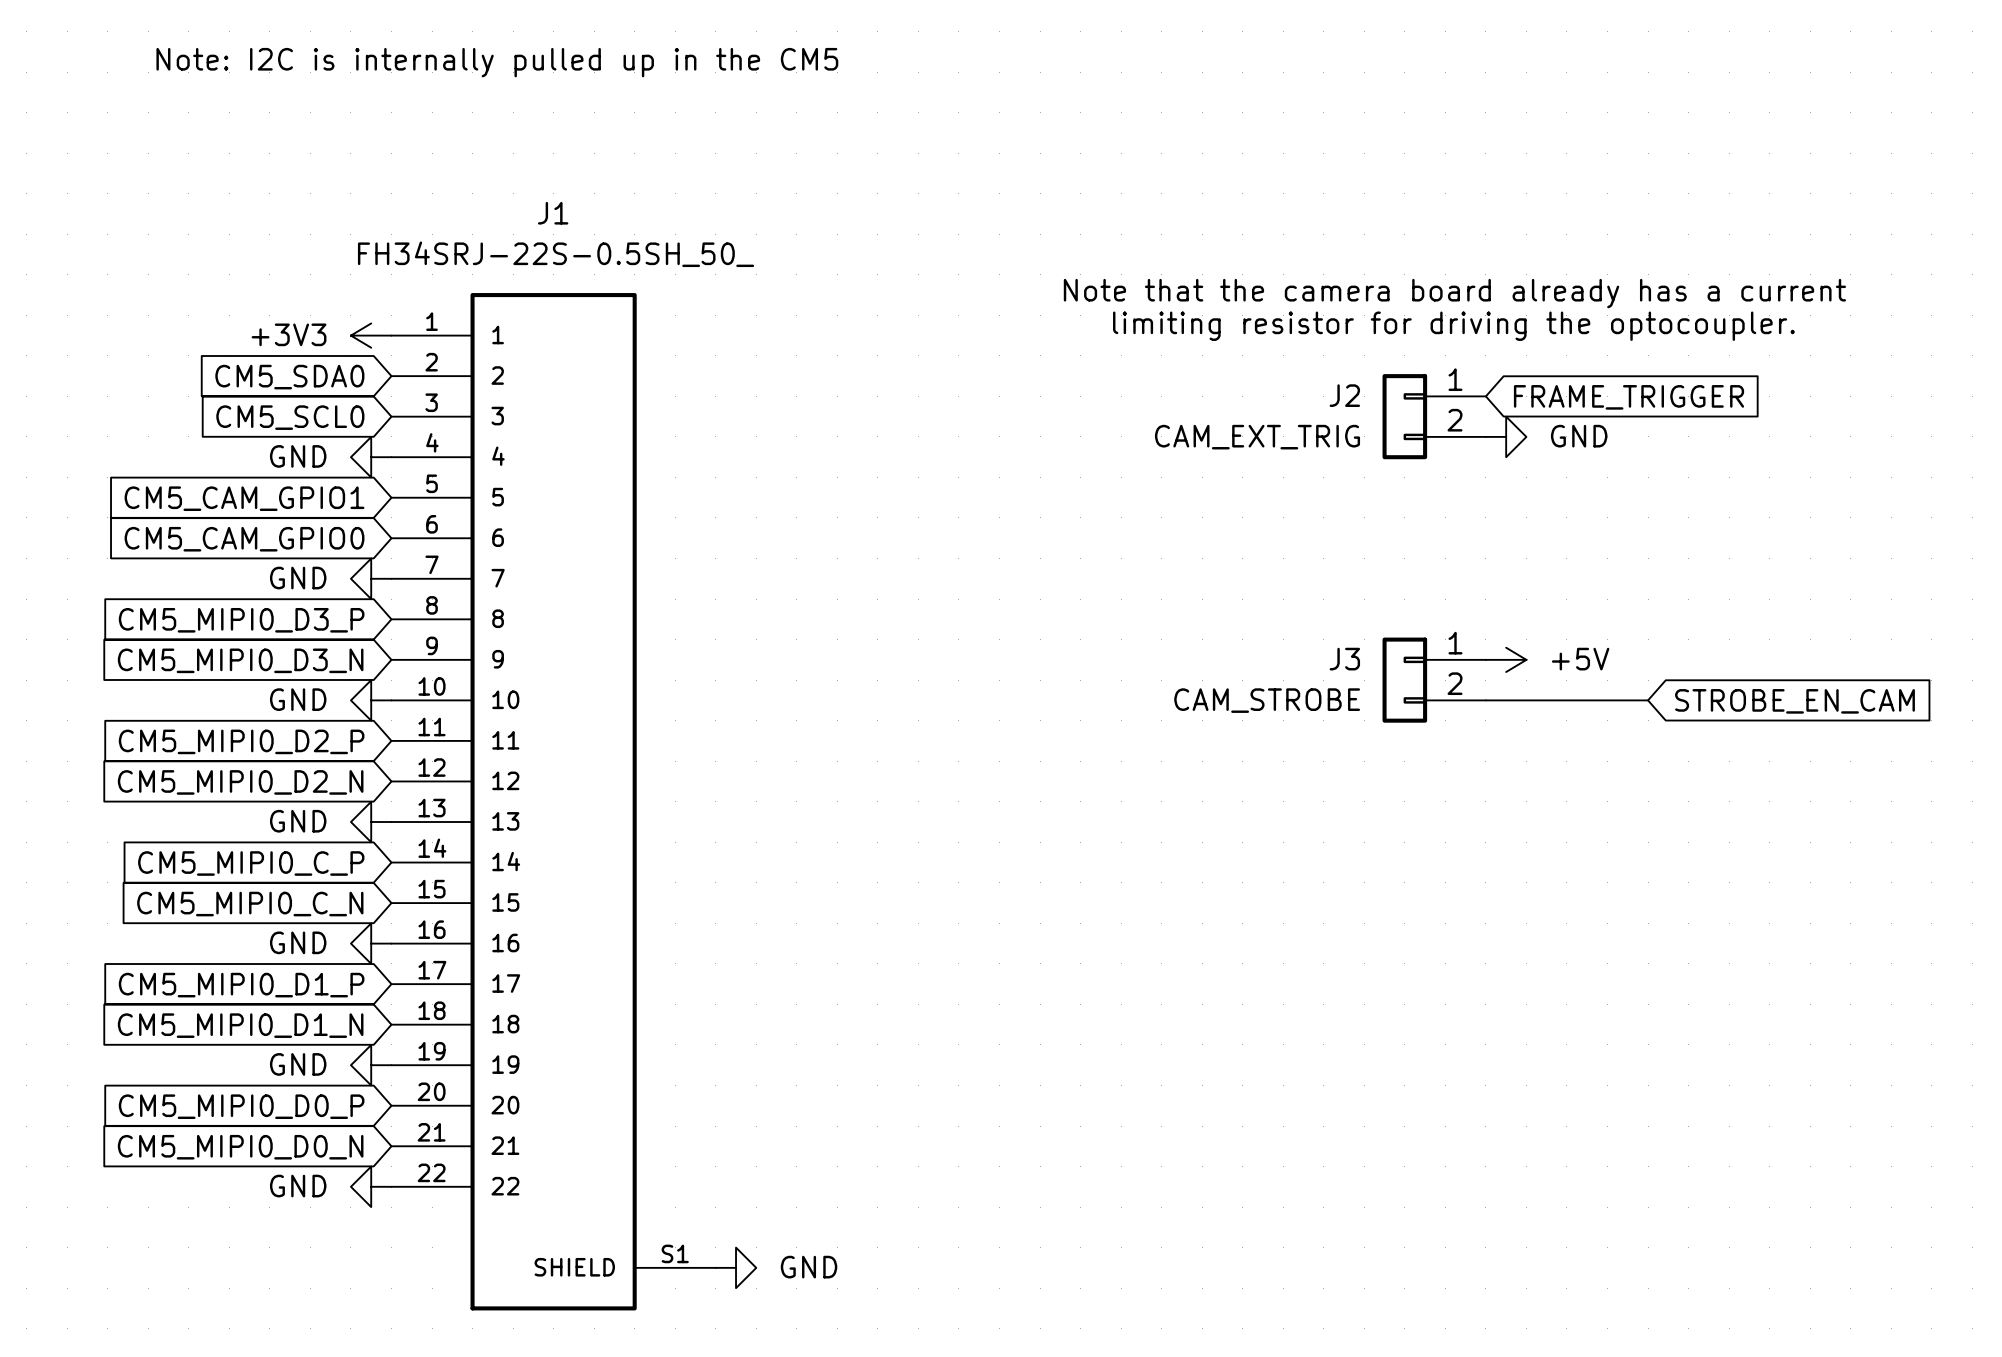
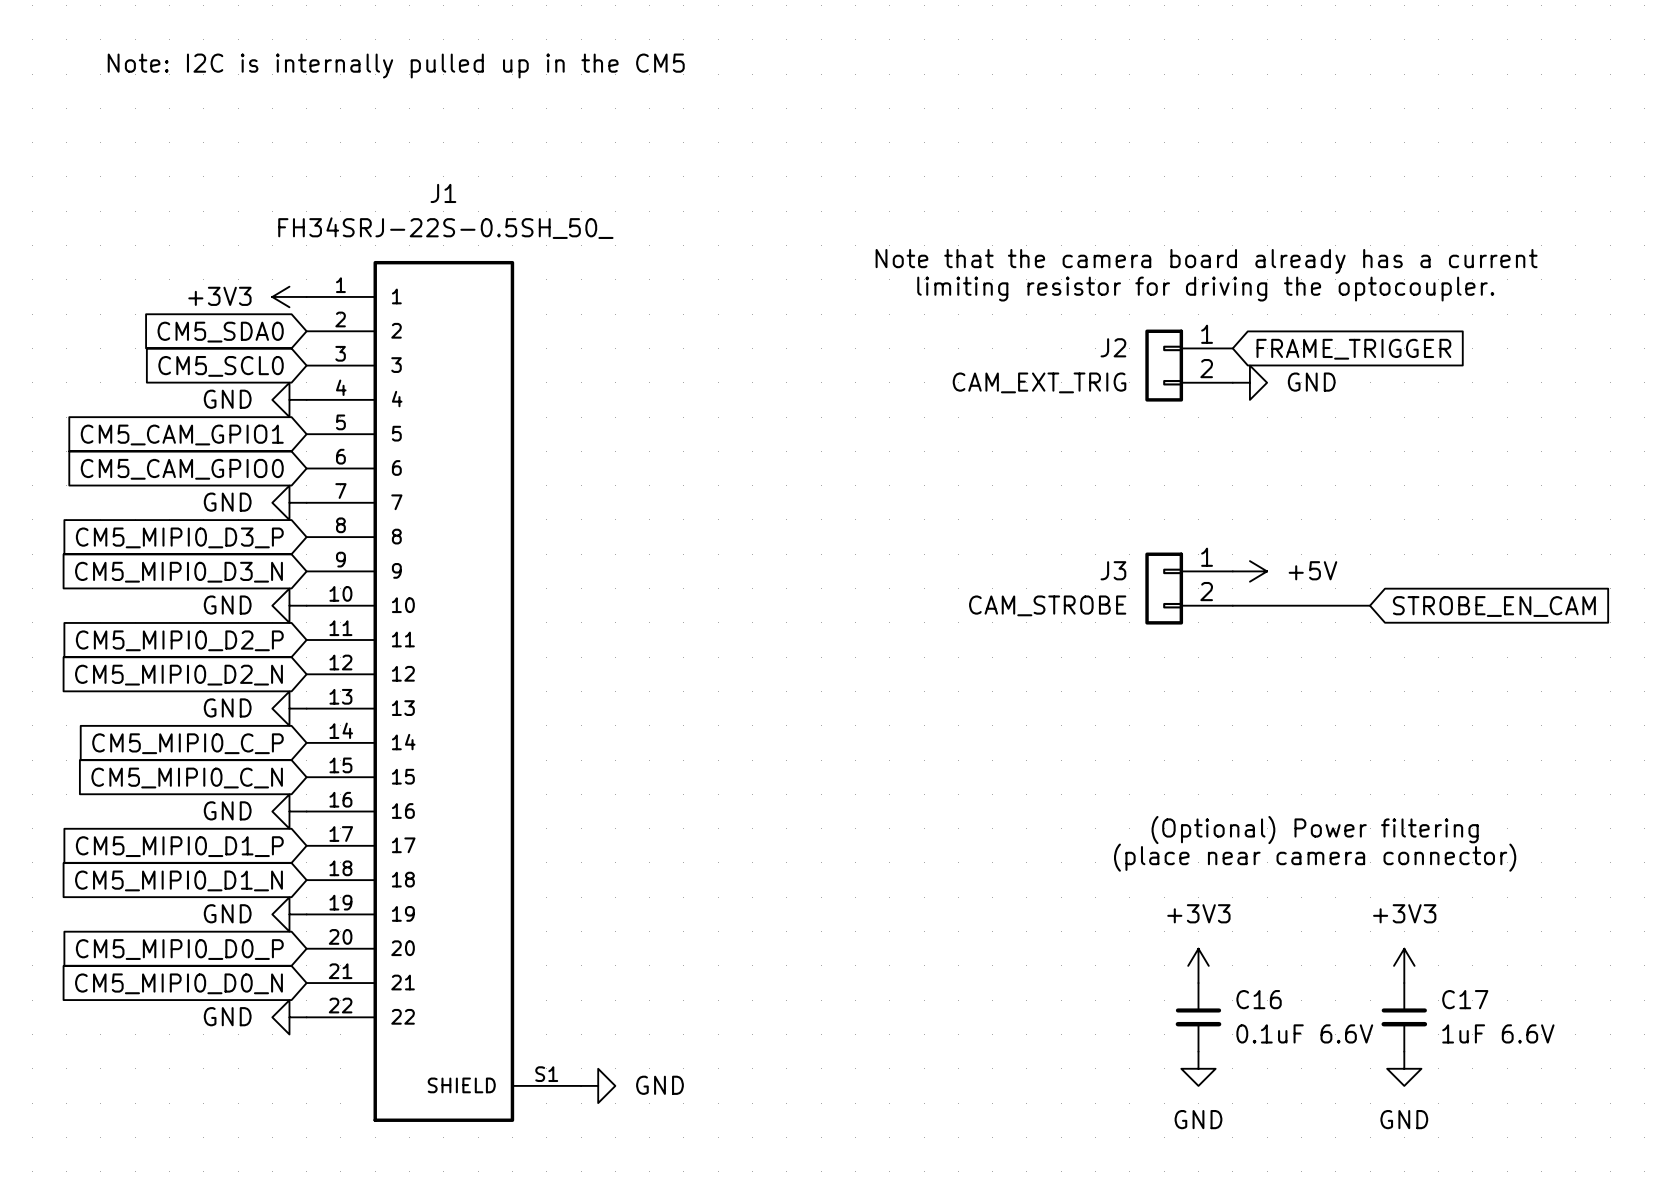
text: none -> (Optional) Power filtering (1315, 830)
text: none -> (place near camera connector) (1315, 857)
power symbol: none -> +3V3 (1198, 965)
power symbol: none -> +3V3 (1404, 965)
C16: none -> 0.1uF 6.6V (1198, 1017)
C17: none -> 1uF 6.6V (1404, 1017)
power symbol: none -> GND (1198, 1068)
power symbol: none -> GND (1404, 1068)

